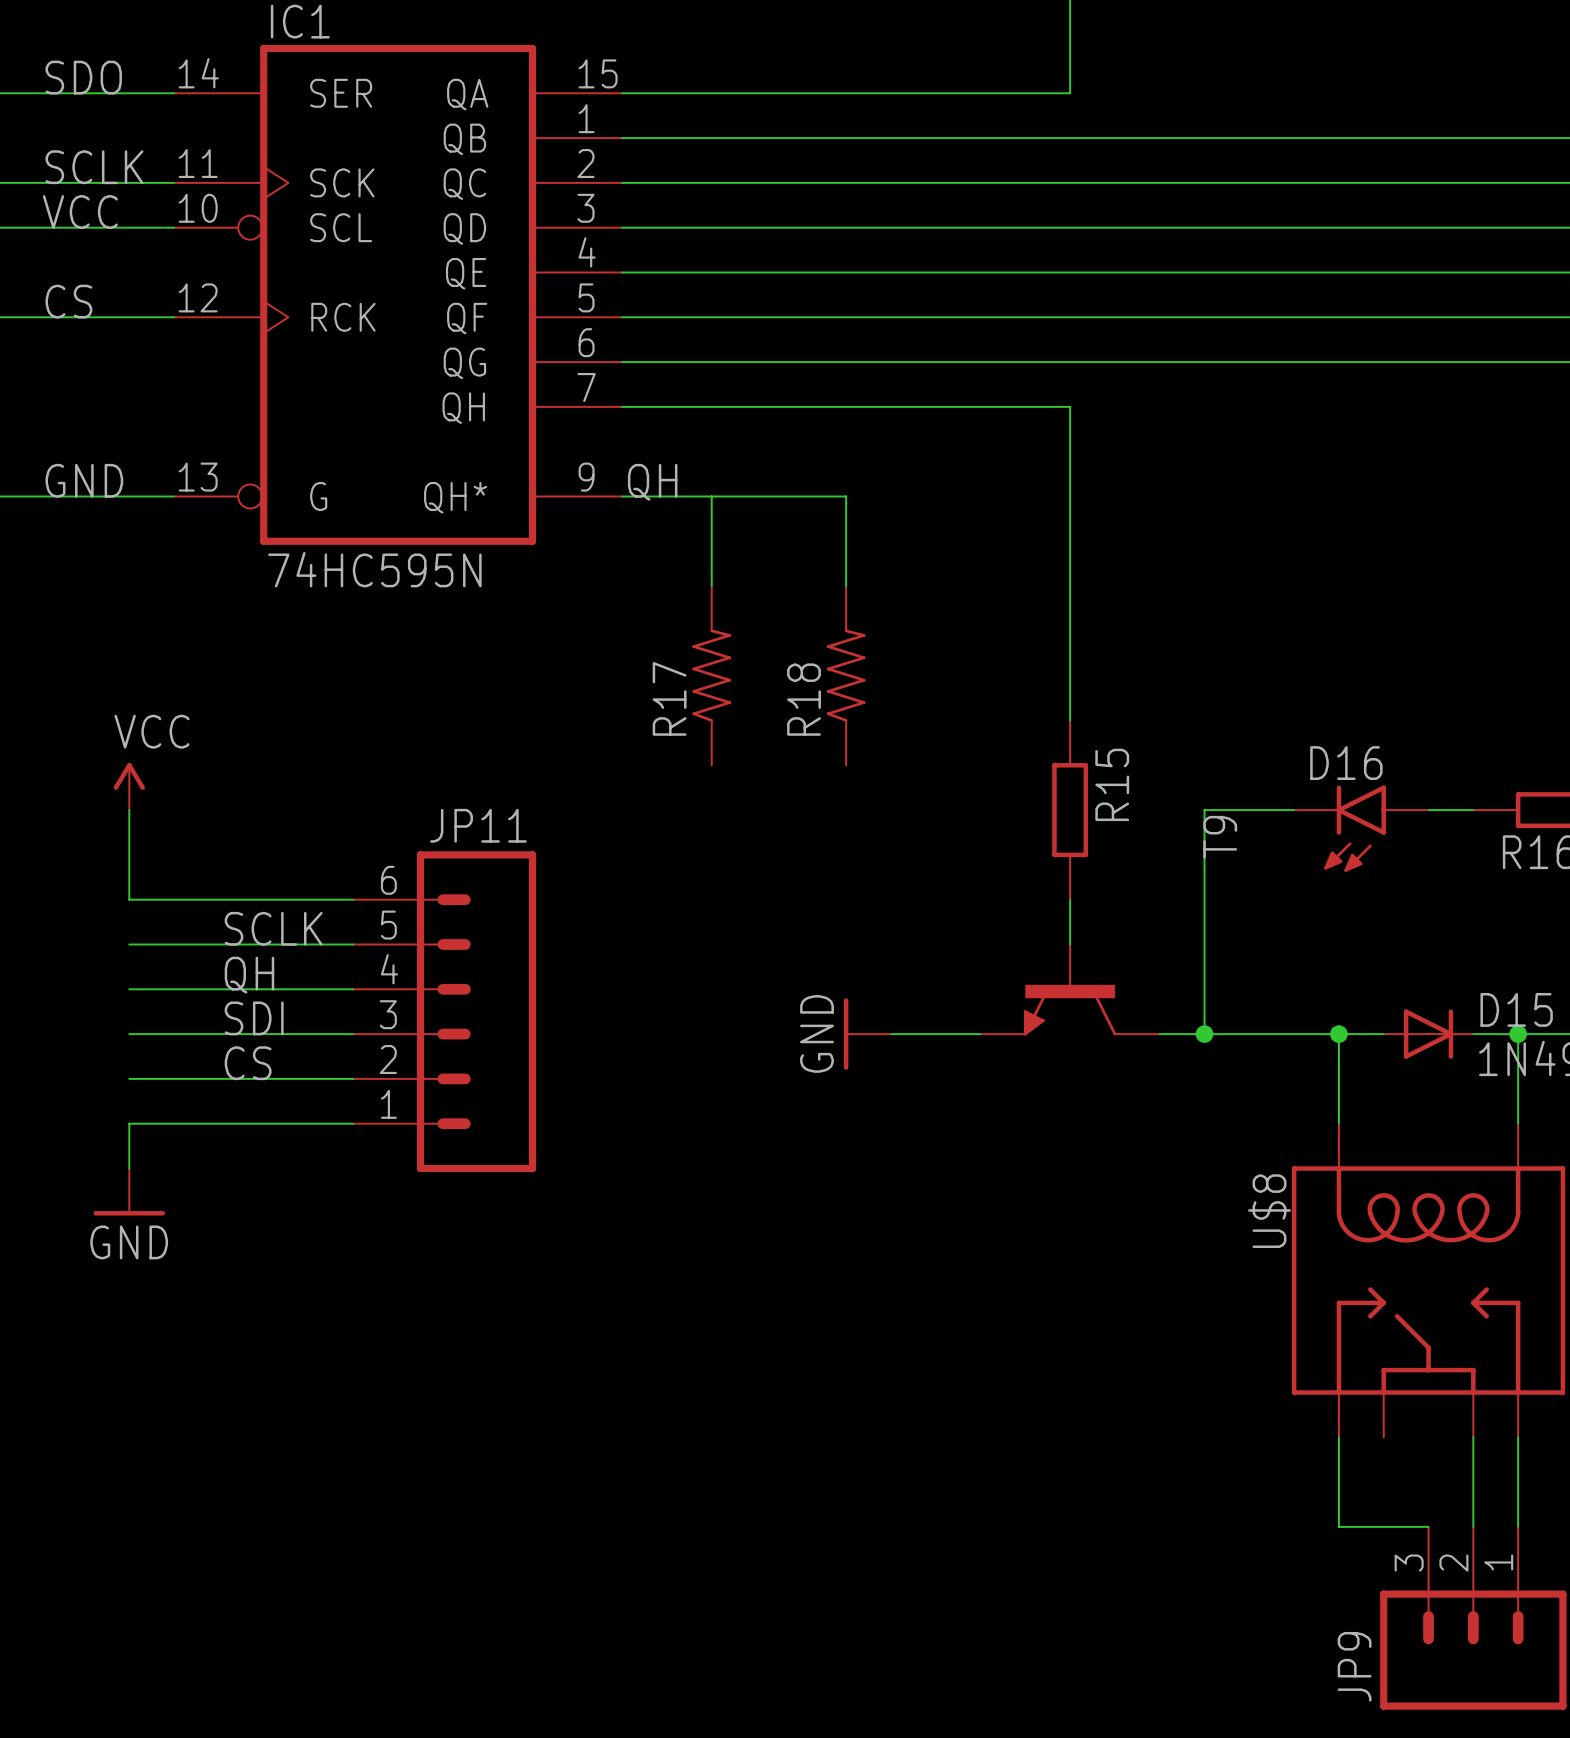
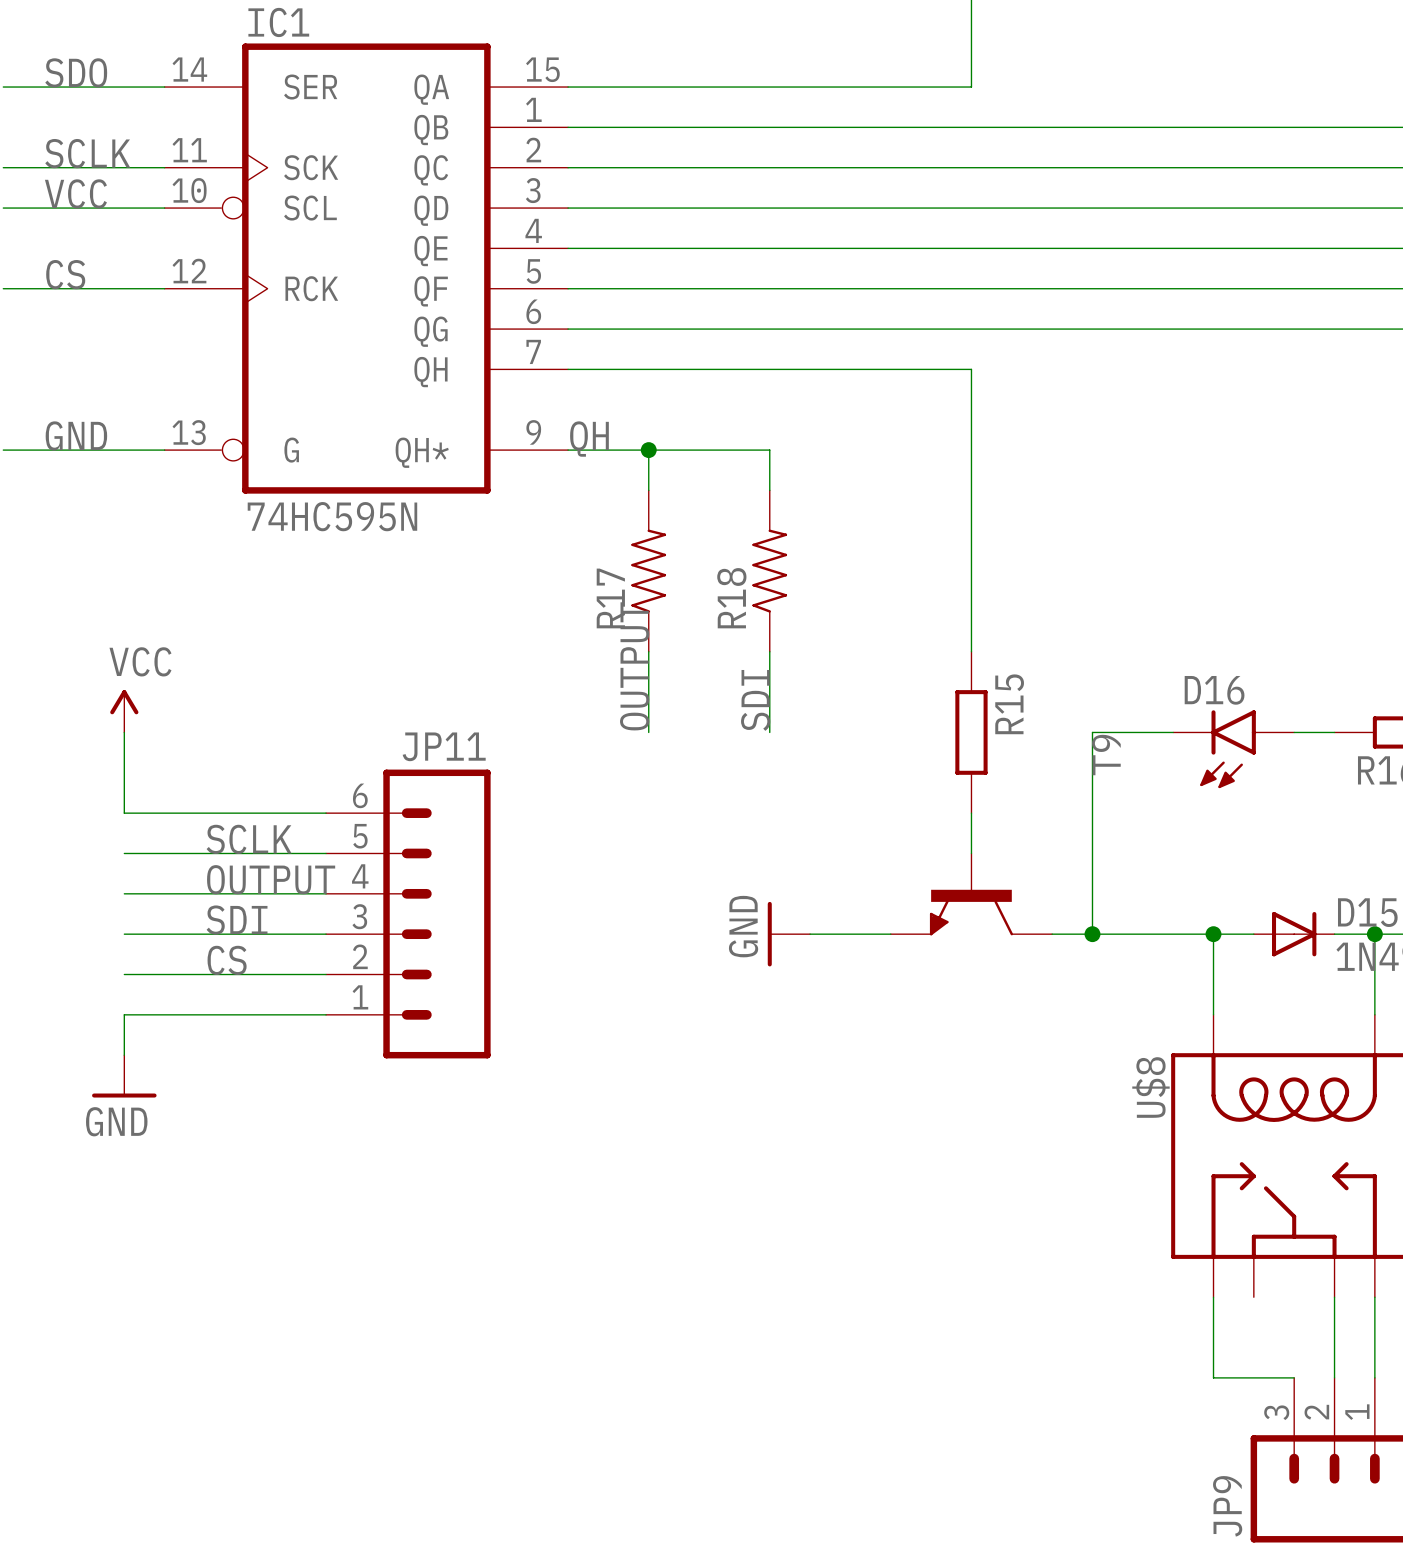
junction: none -> (648, 450)
R17 position: (711, 675) -> (648, 571)
R18 position: (846, 675) -> (769, 571)
wire: none -> (648, 651) (648, 732)
wire: none -> (769, 651) (769, 732)
label: none -> OUTPUT (634, 666)
label: none -> SDI (755, 700)
label: QH (249, 975) -> OUTPUT (271, 879)

